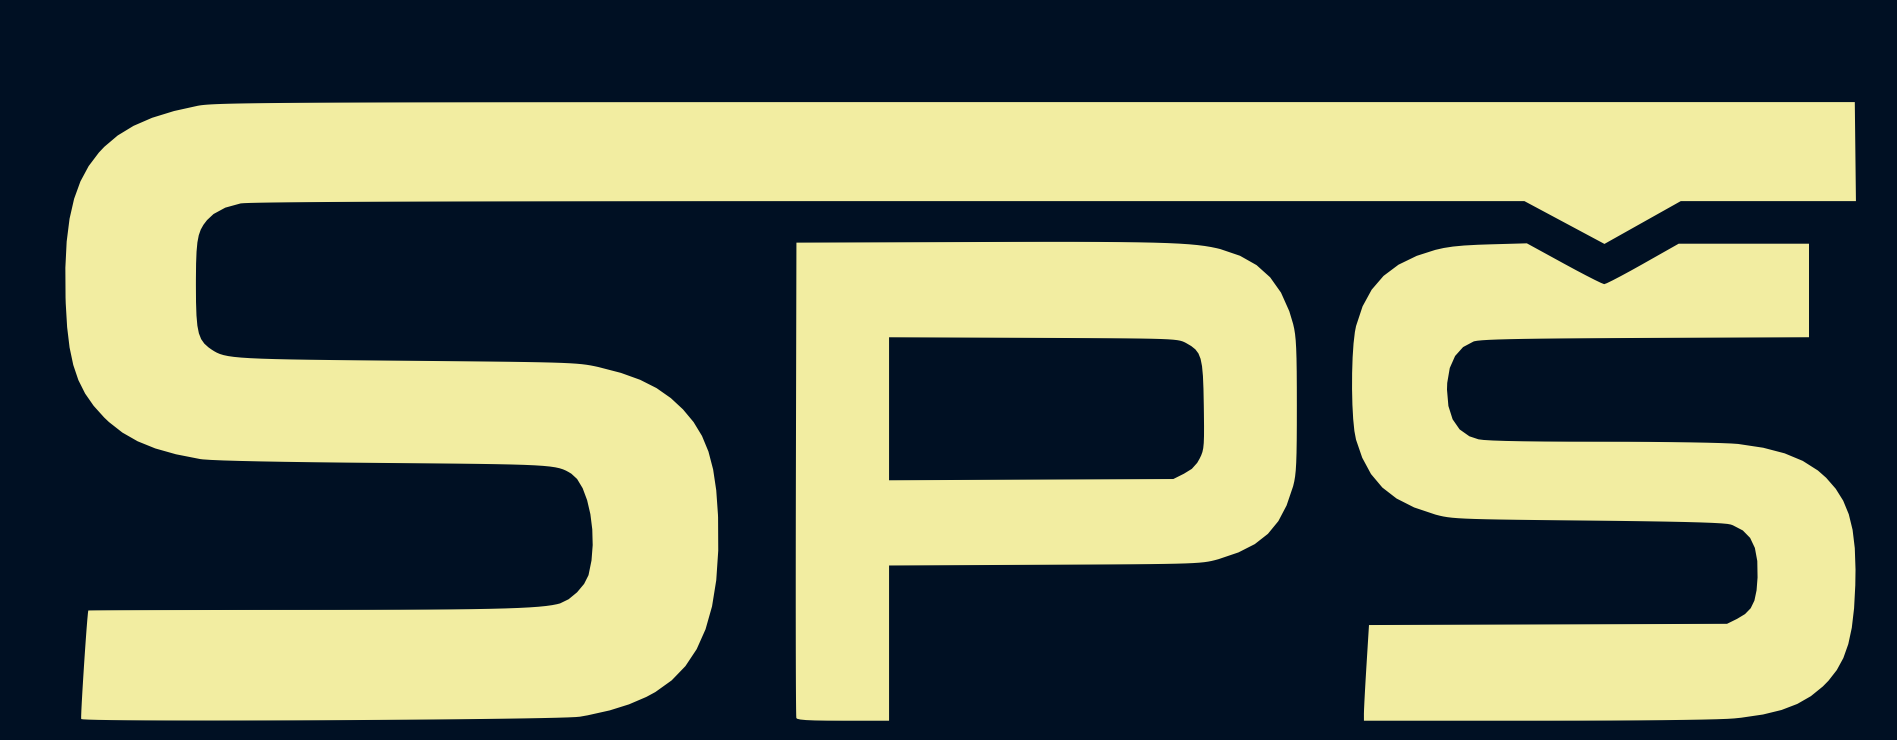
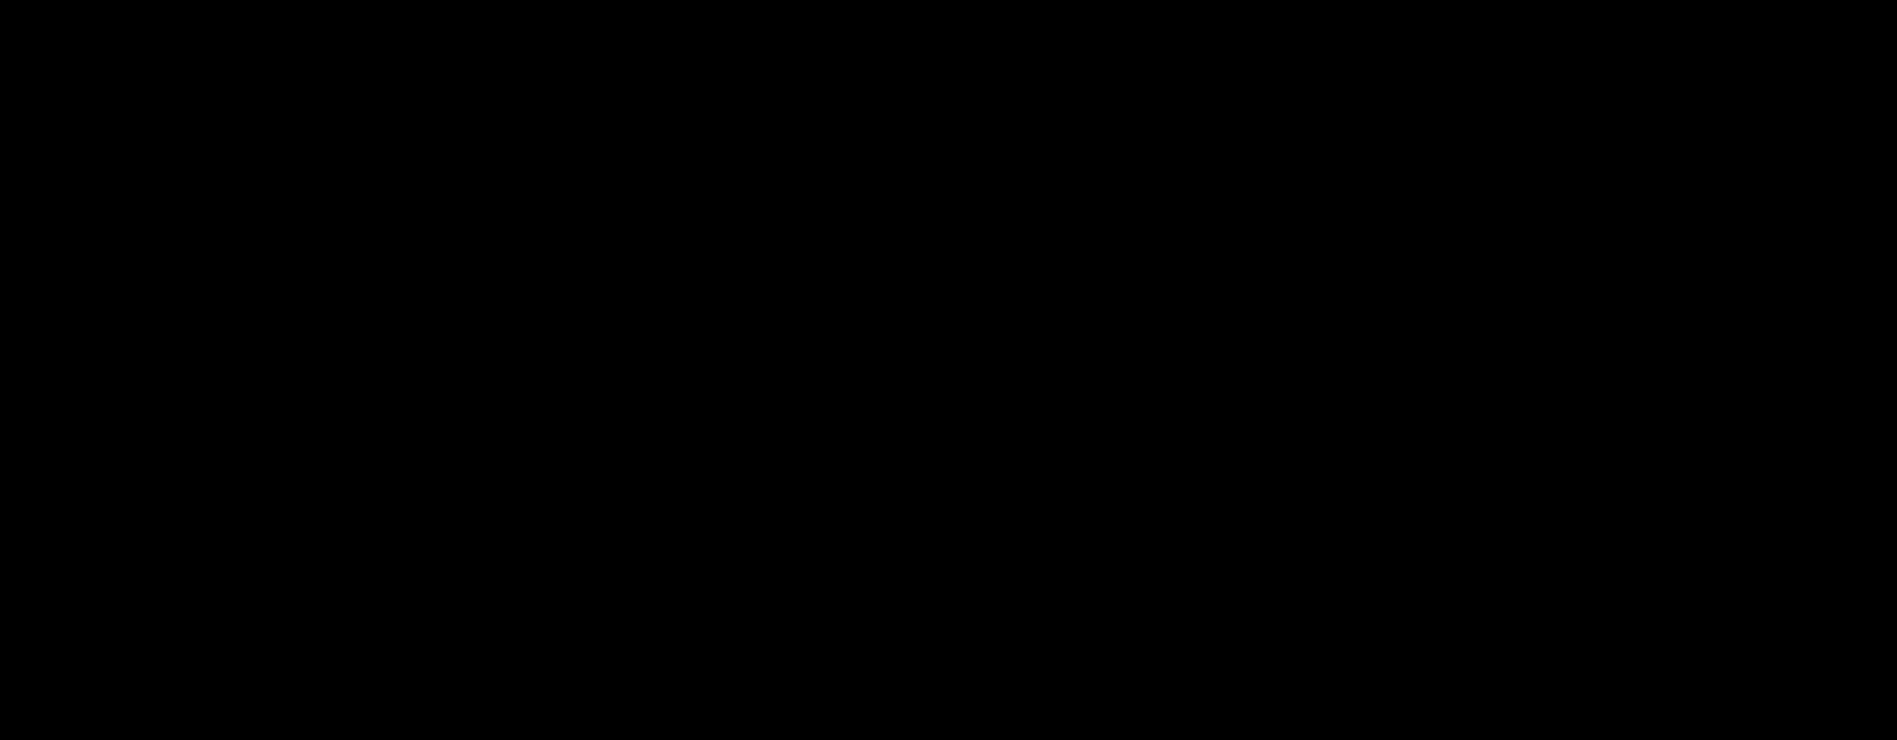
drawing: [65, 102, 1856, 721] -> none

